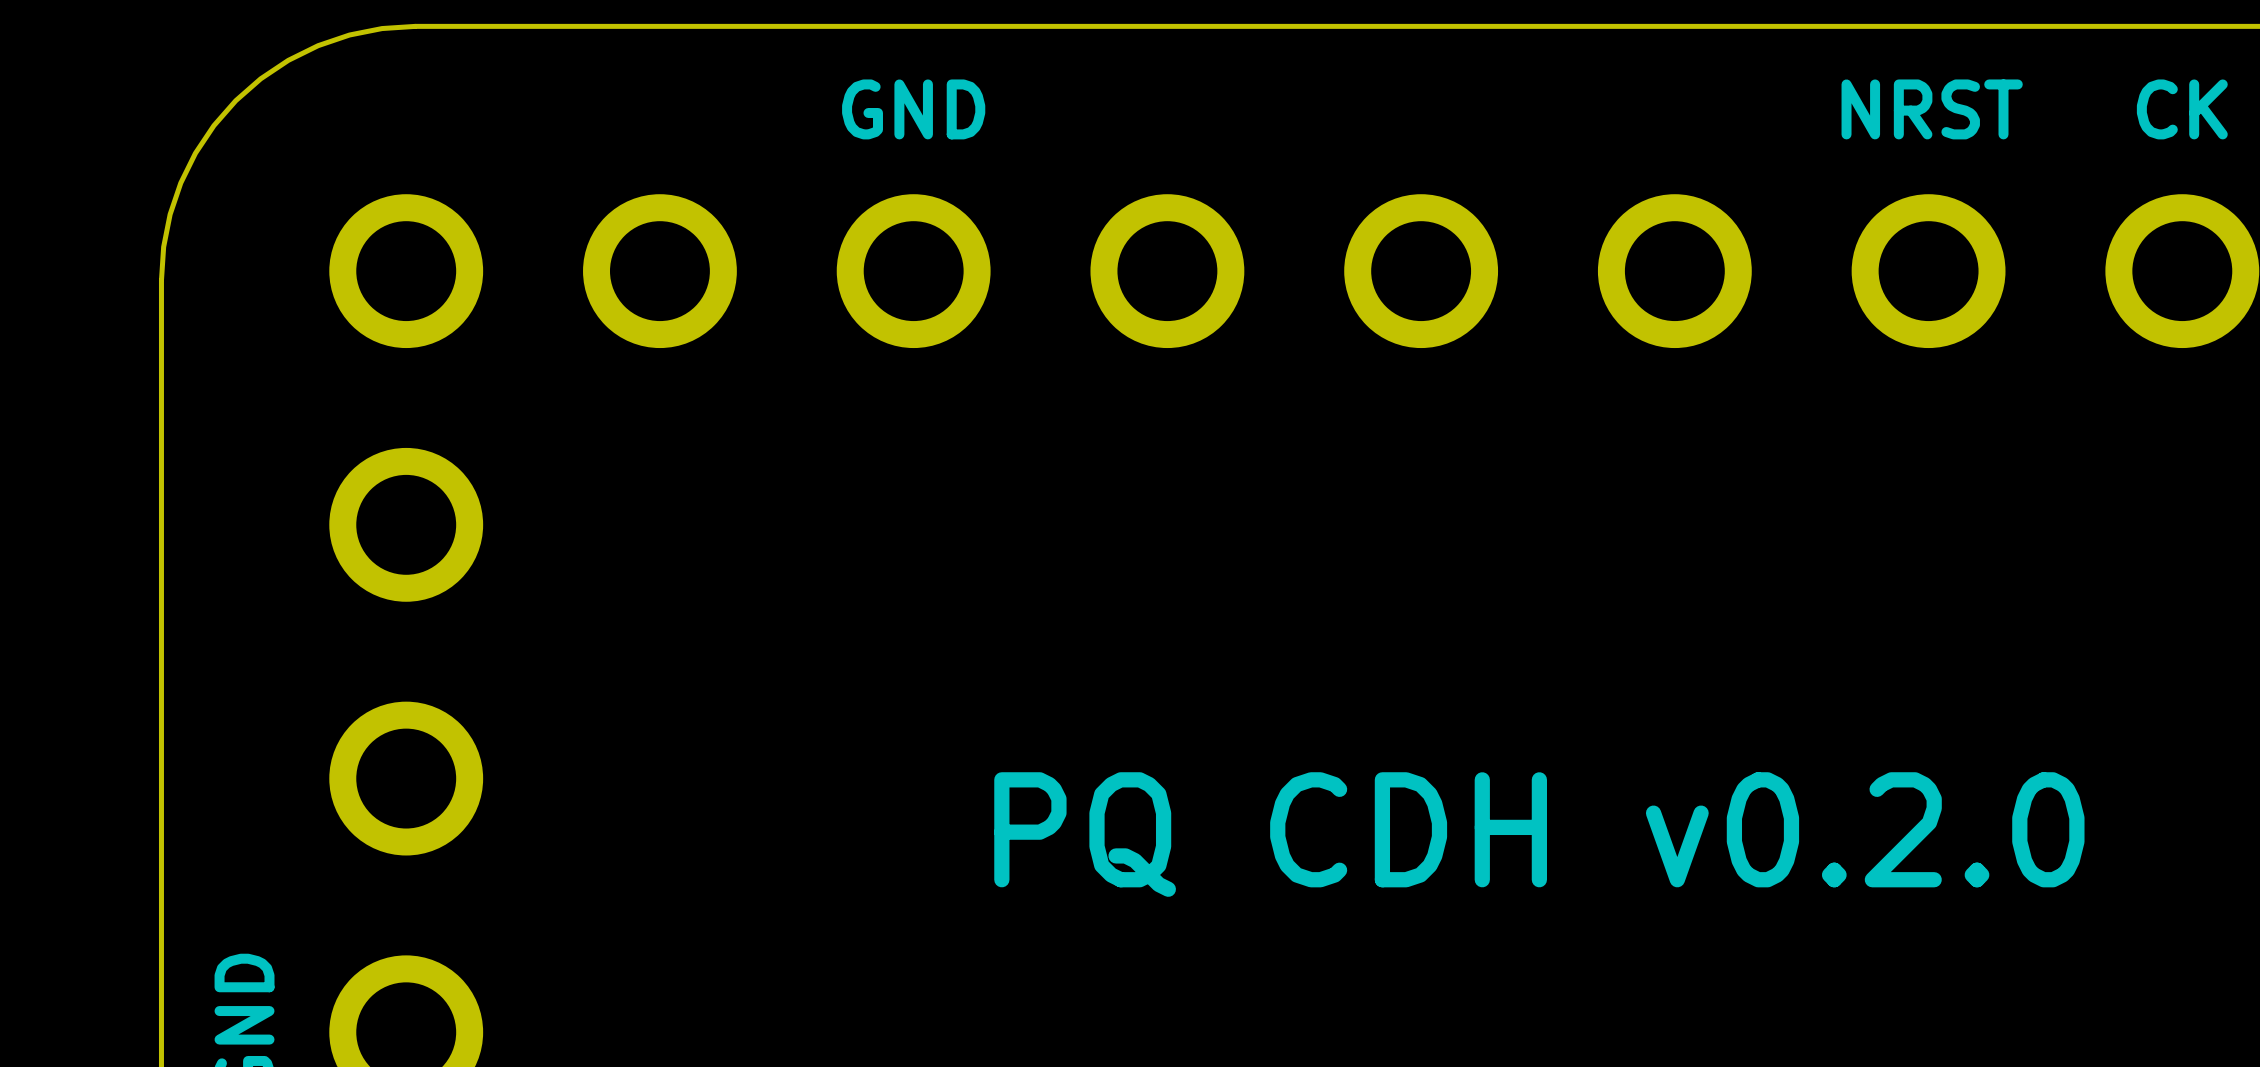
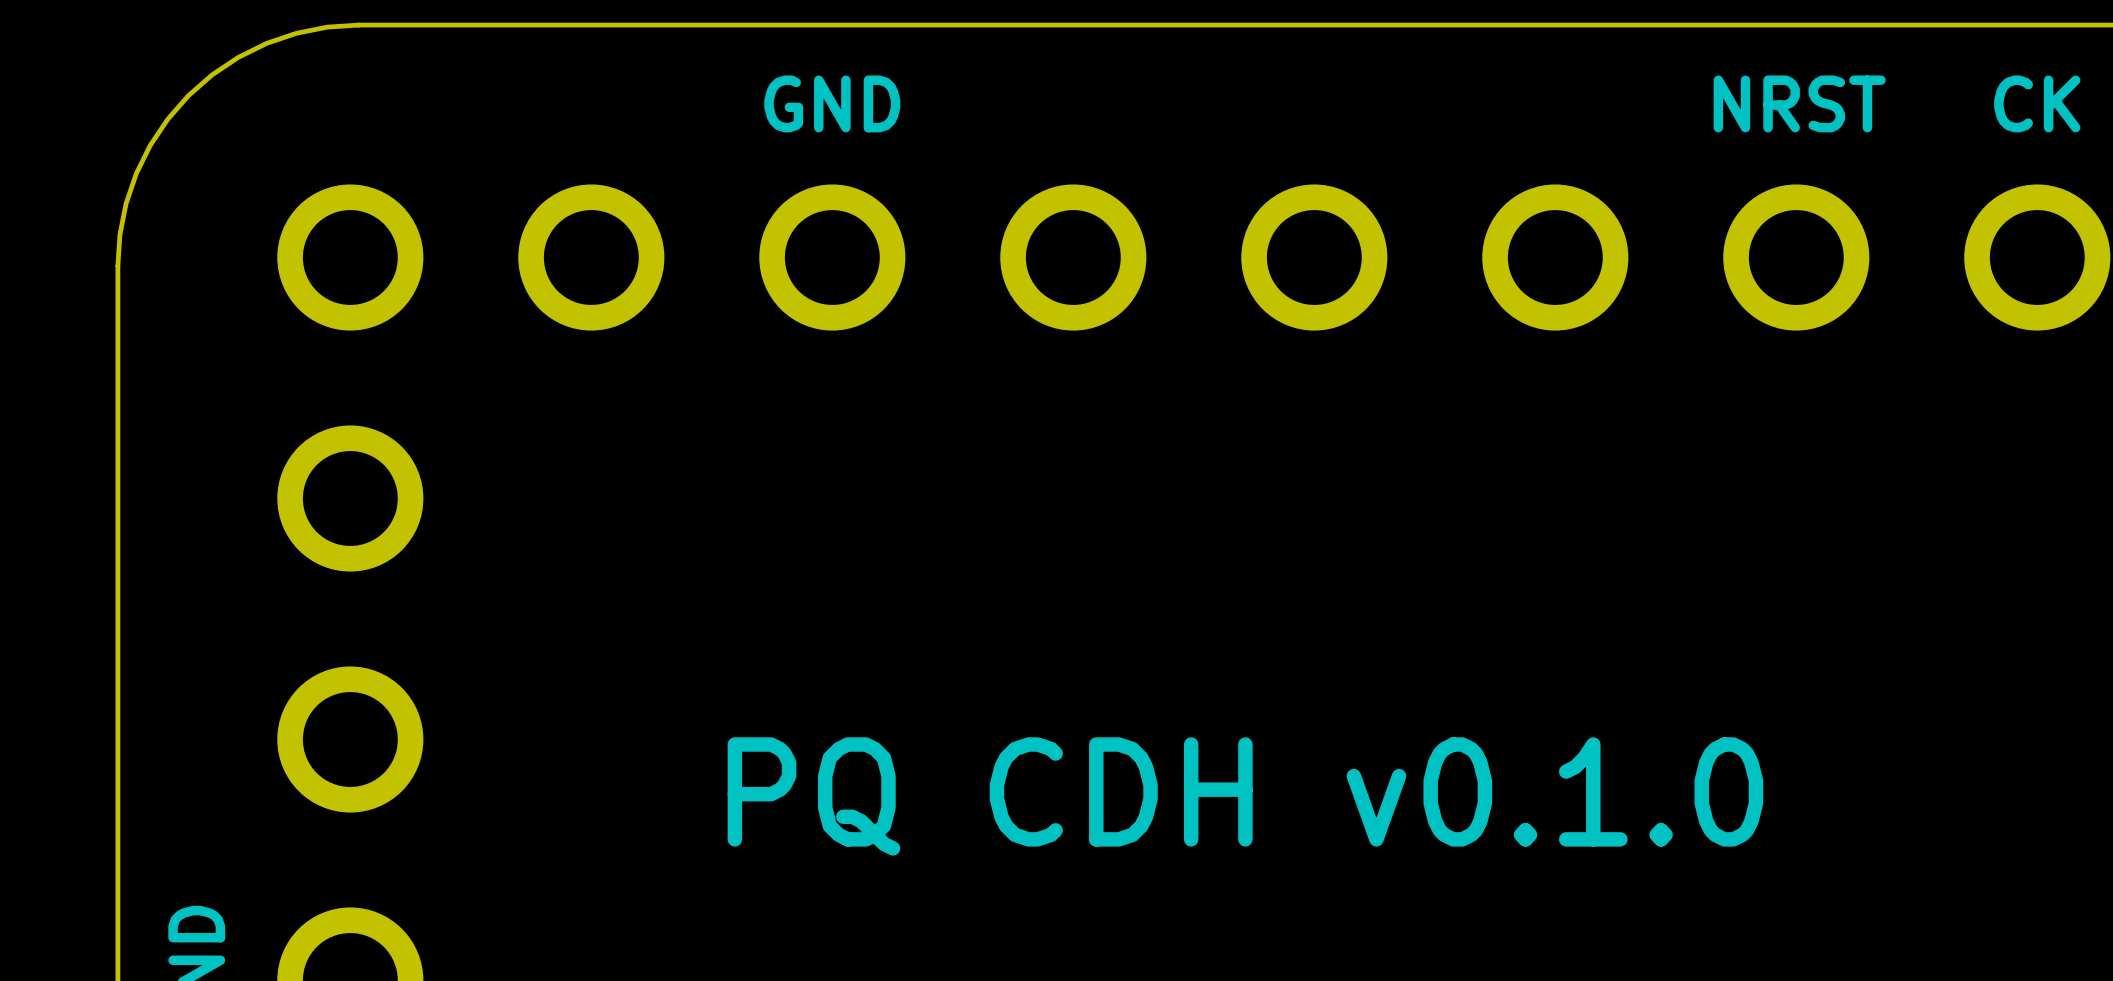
text: PQ CDH v0.2.0 (1539, 834) -> PQ CDH v0.1.0 (1245, 796)

